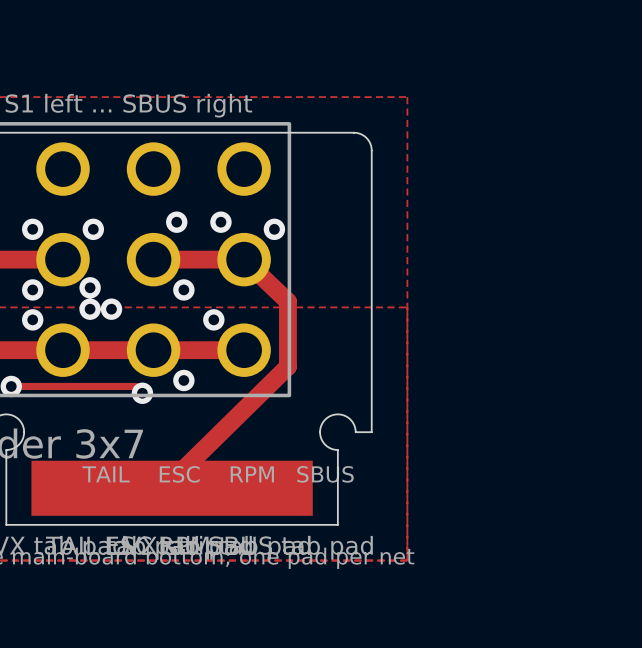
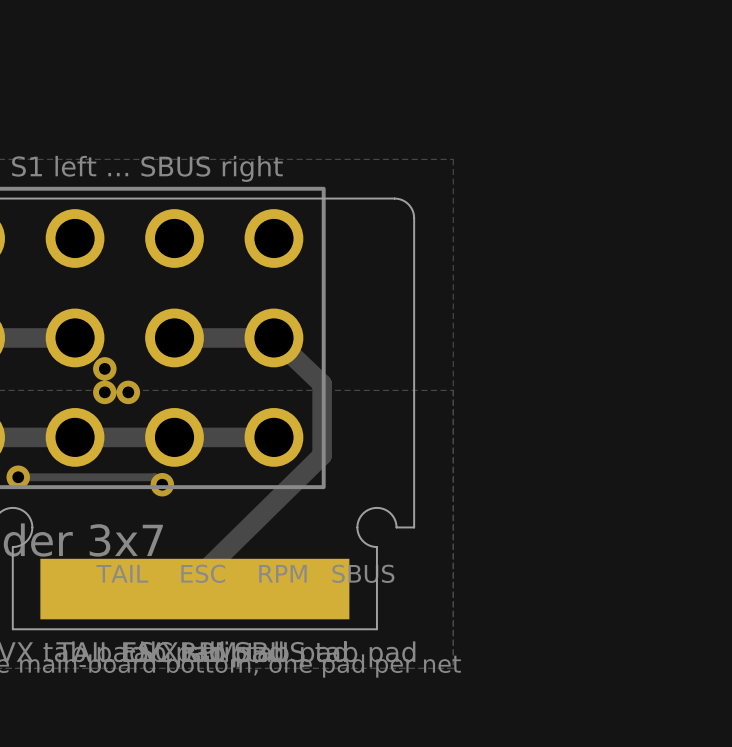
via: (176, 222) -> none
via: (220, 222) -> none
via: (32, 229) -> none
via: (93, 229) -> none
via: (274, 229) -> none
via: (32, 289) -> none
via: (183, 289) -> none
via: (32, 319) -> none
via: (213, 319) -> none
via: (183, 380) -> none

